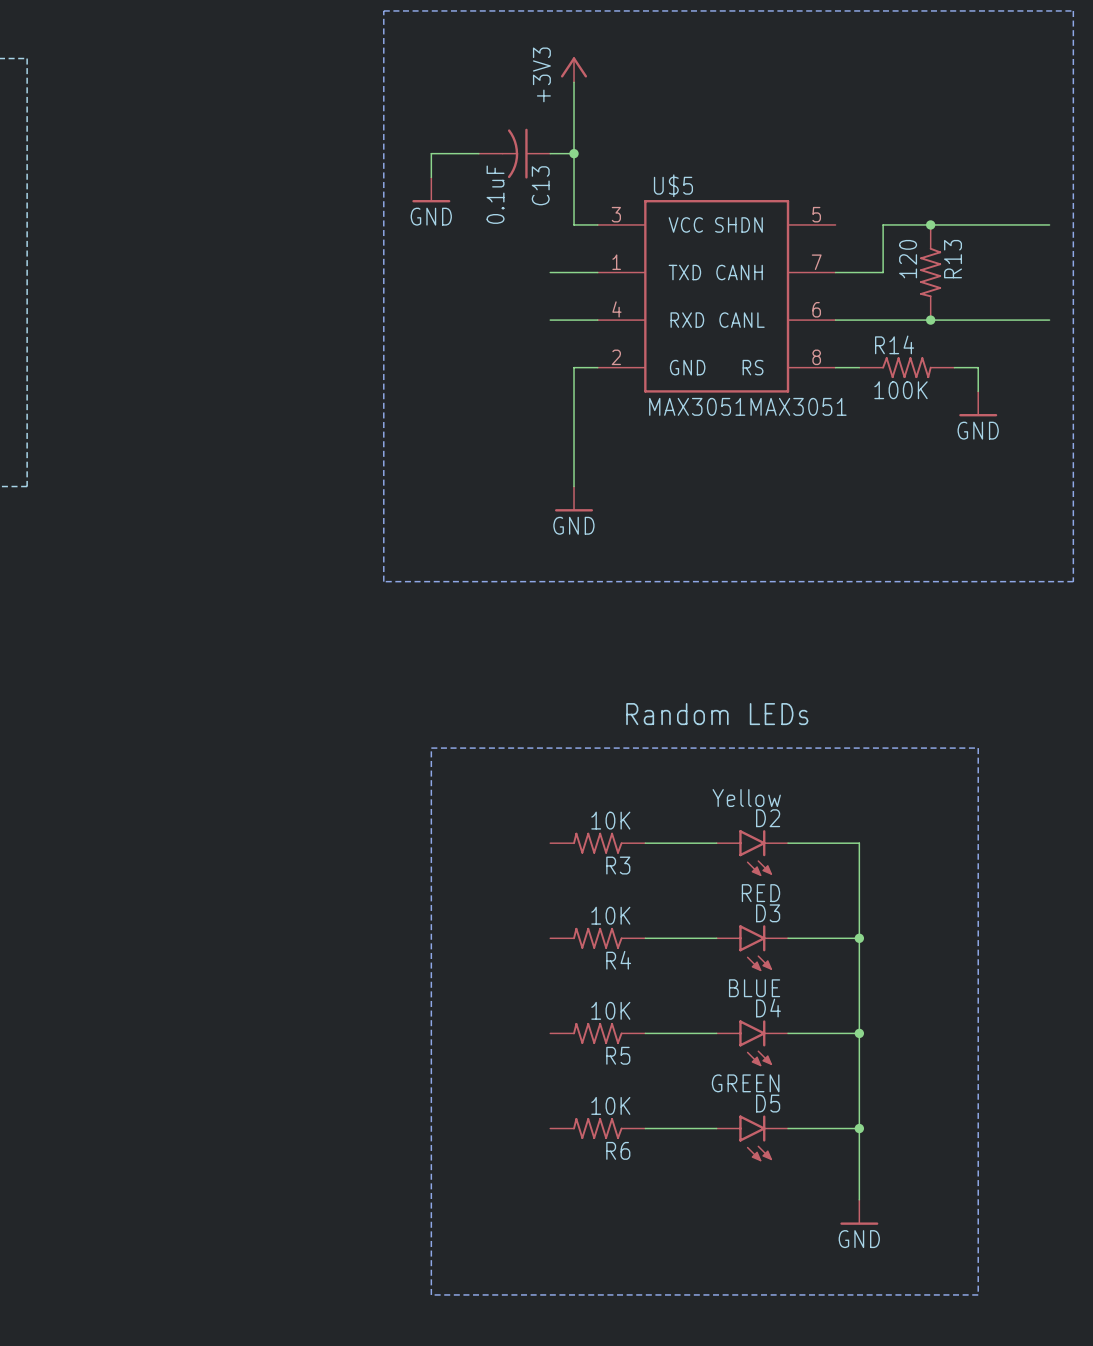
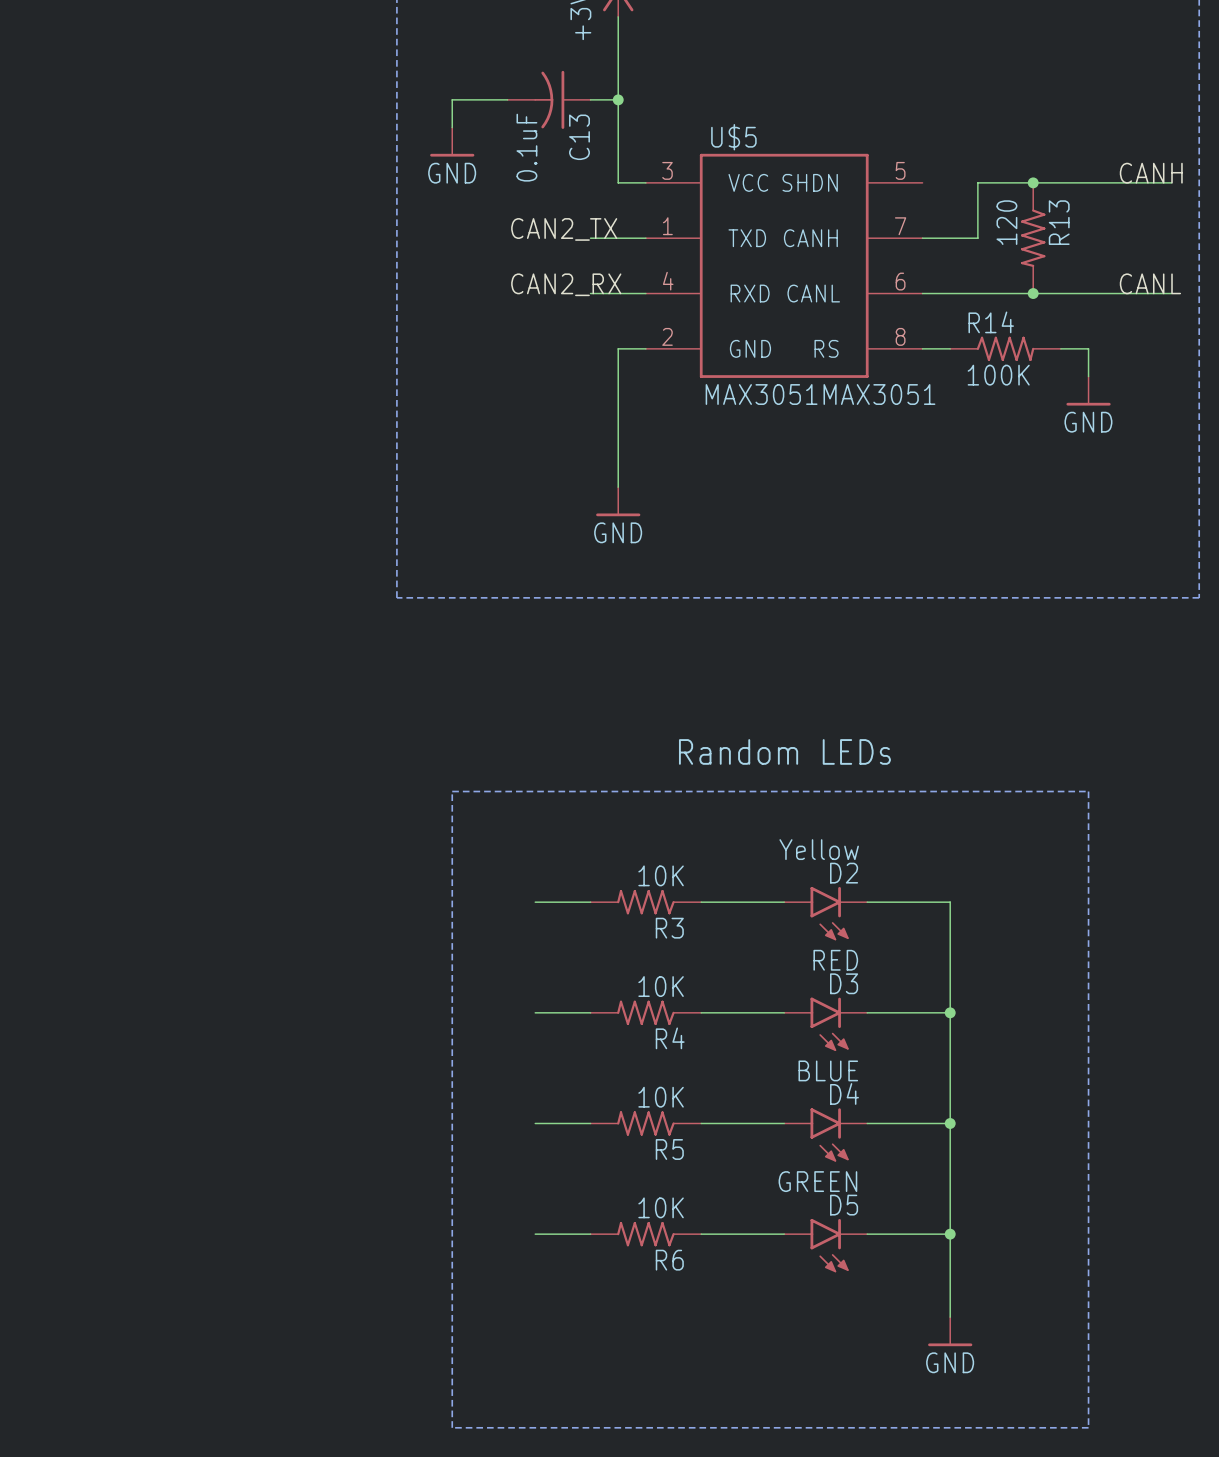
label: none -> CANH (1151, 173)
label: none -> CAN2_TX (564, 229)
label: none -> CANL (1150, 283)
label: none -> CAN2_RX (566, 284)
wire: none -> (535, 902) (590, 902)
wire: none -> (535, 1012) (590, 1012)
wire: none -> (535, 1123) (590, 1123)
wire: none -> (535, 1234) (590, 1234)

